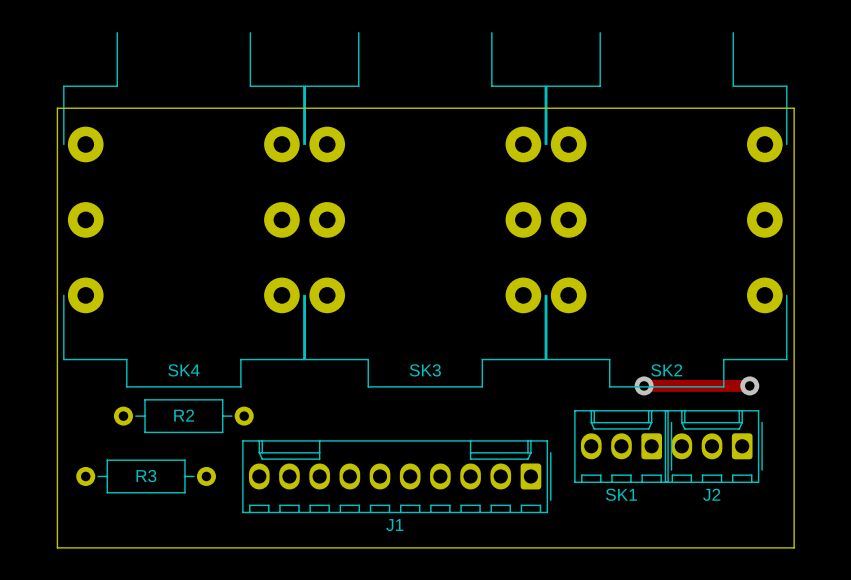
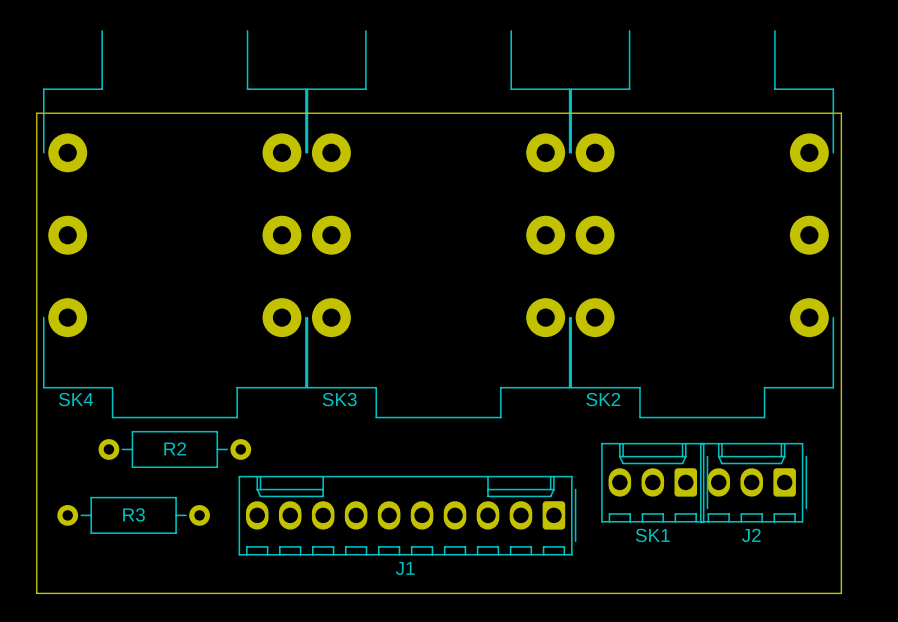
SK4 name position: SK4 (183, 370) -> SK4 (76, 399)
SK3 name position: SK3 (425, 370) -> SK3 (339, 399)
SK2 name position: SK2 (666, 370) -> SK2 (603, 399)
track: (644, 385) (749, 385) -> none
via: (644, 385) -> none
via: (749, 385) -> none

